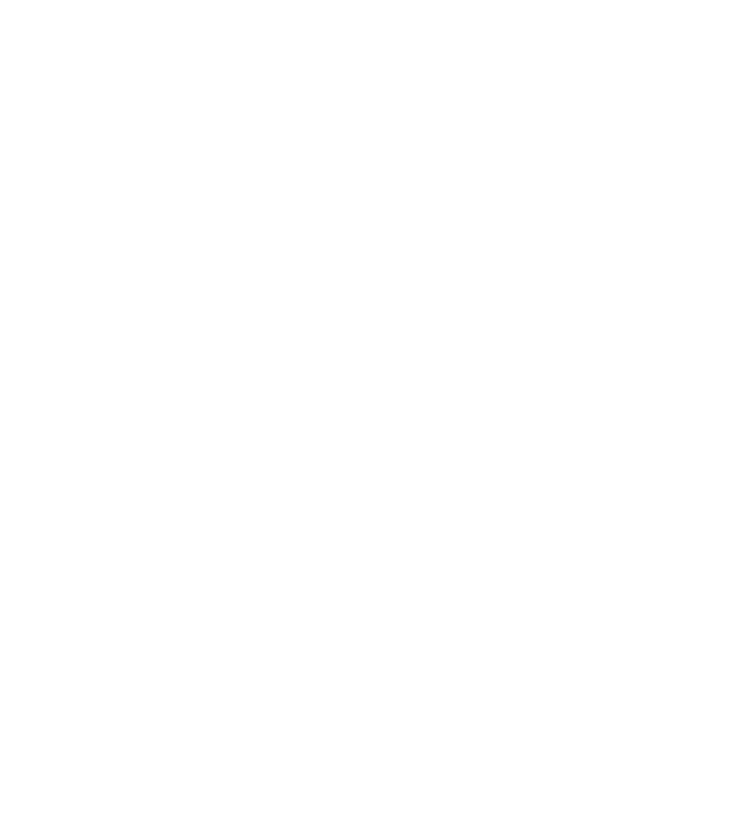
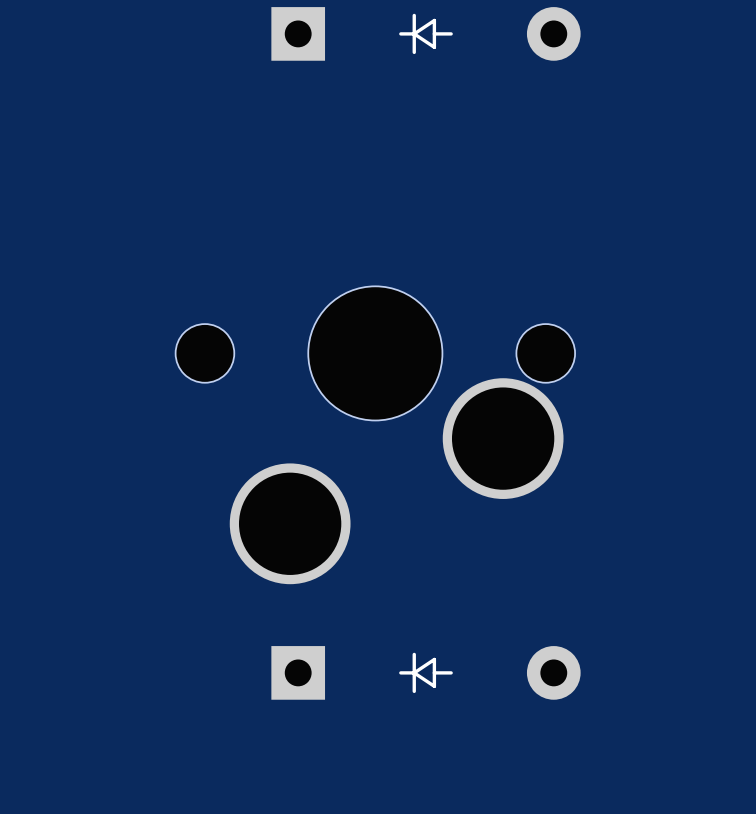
part: none -> (425, 33)
part: none -> (375, 435)
part: none -> (425, 672)

